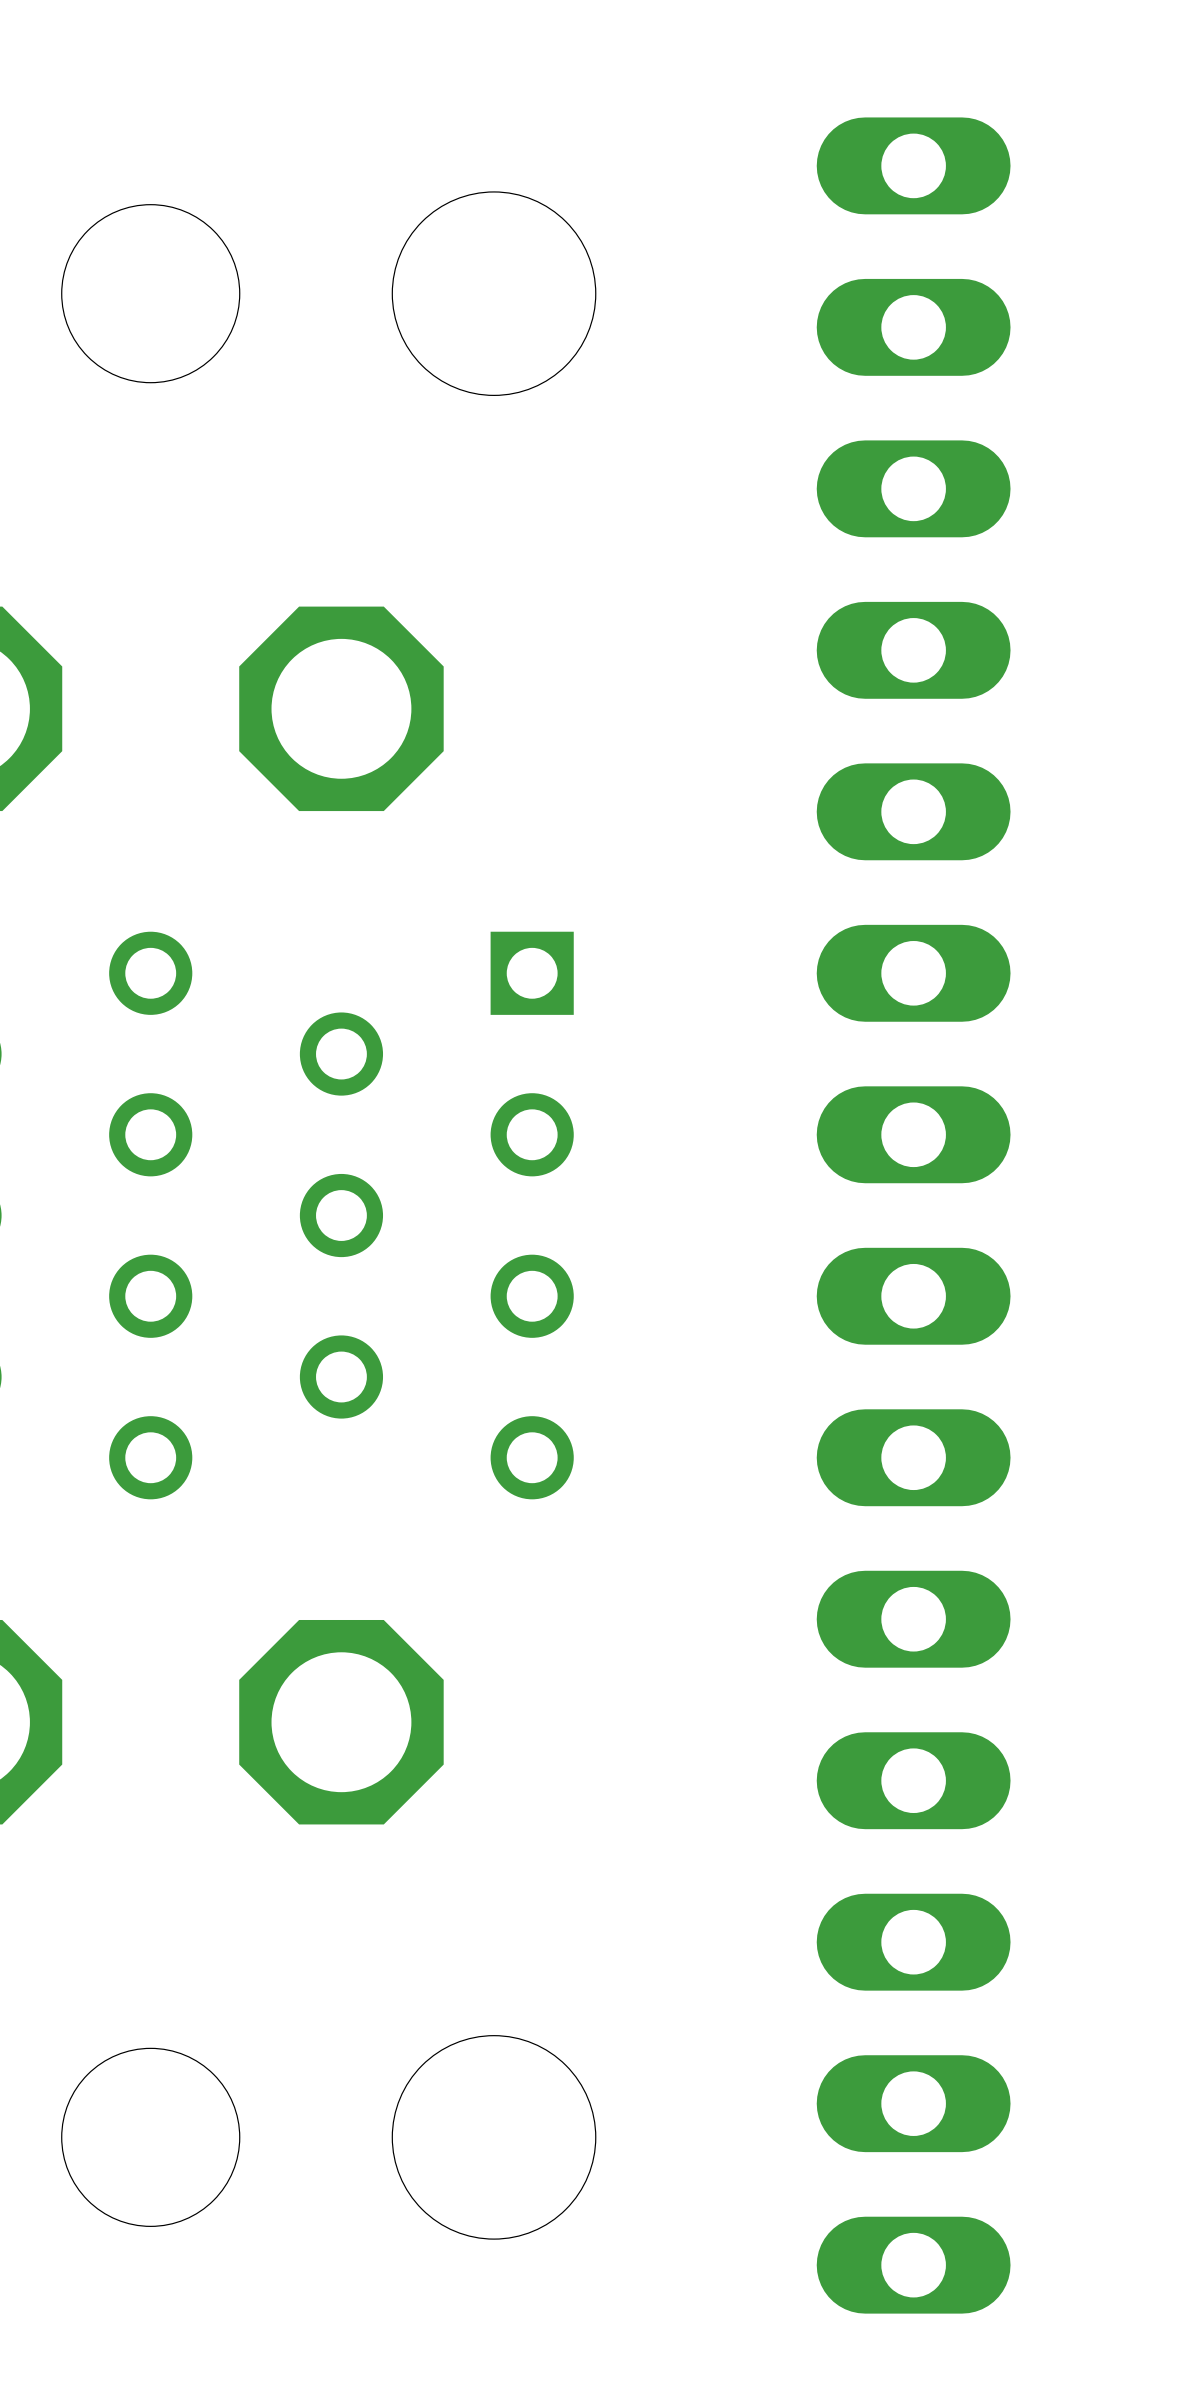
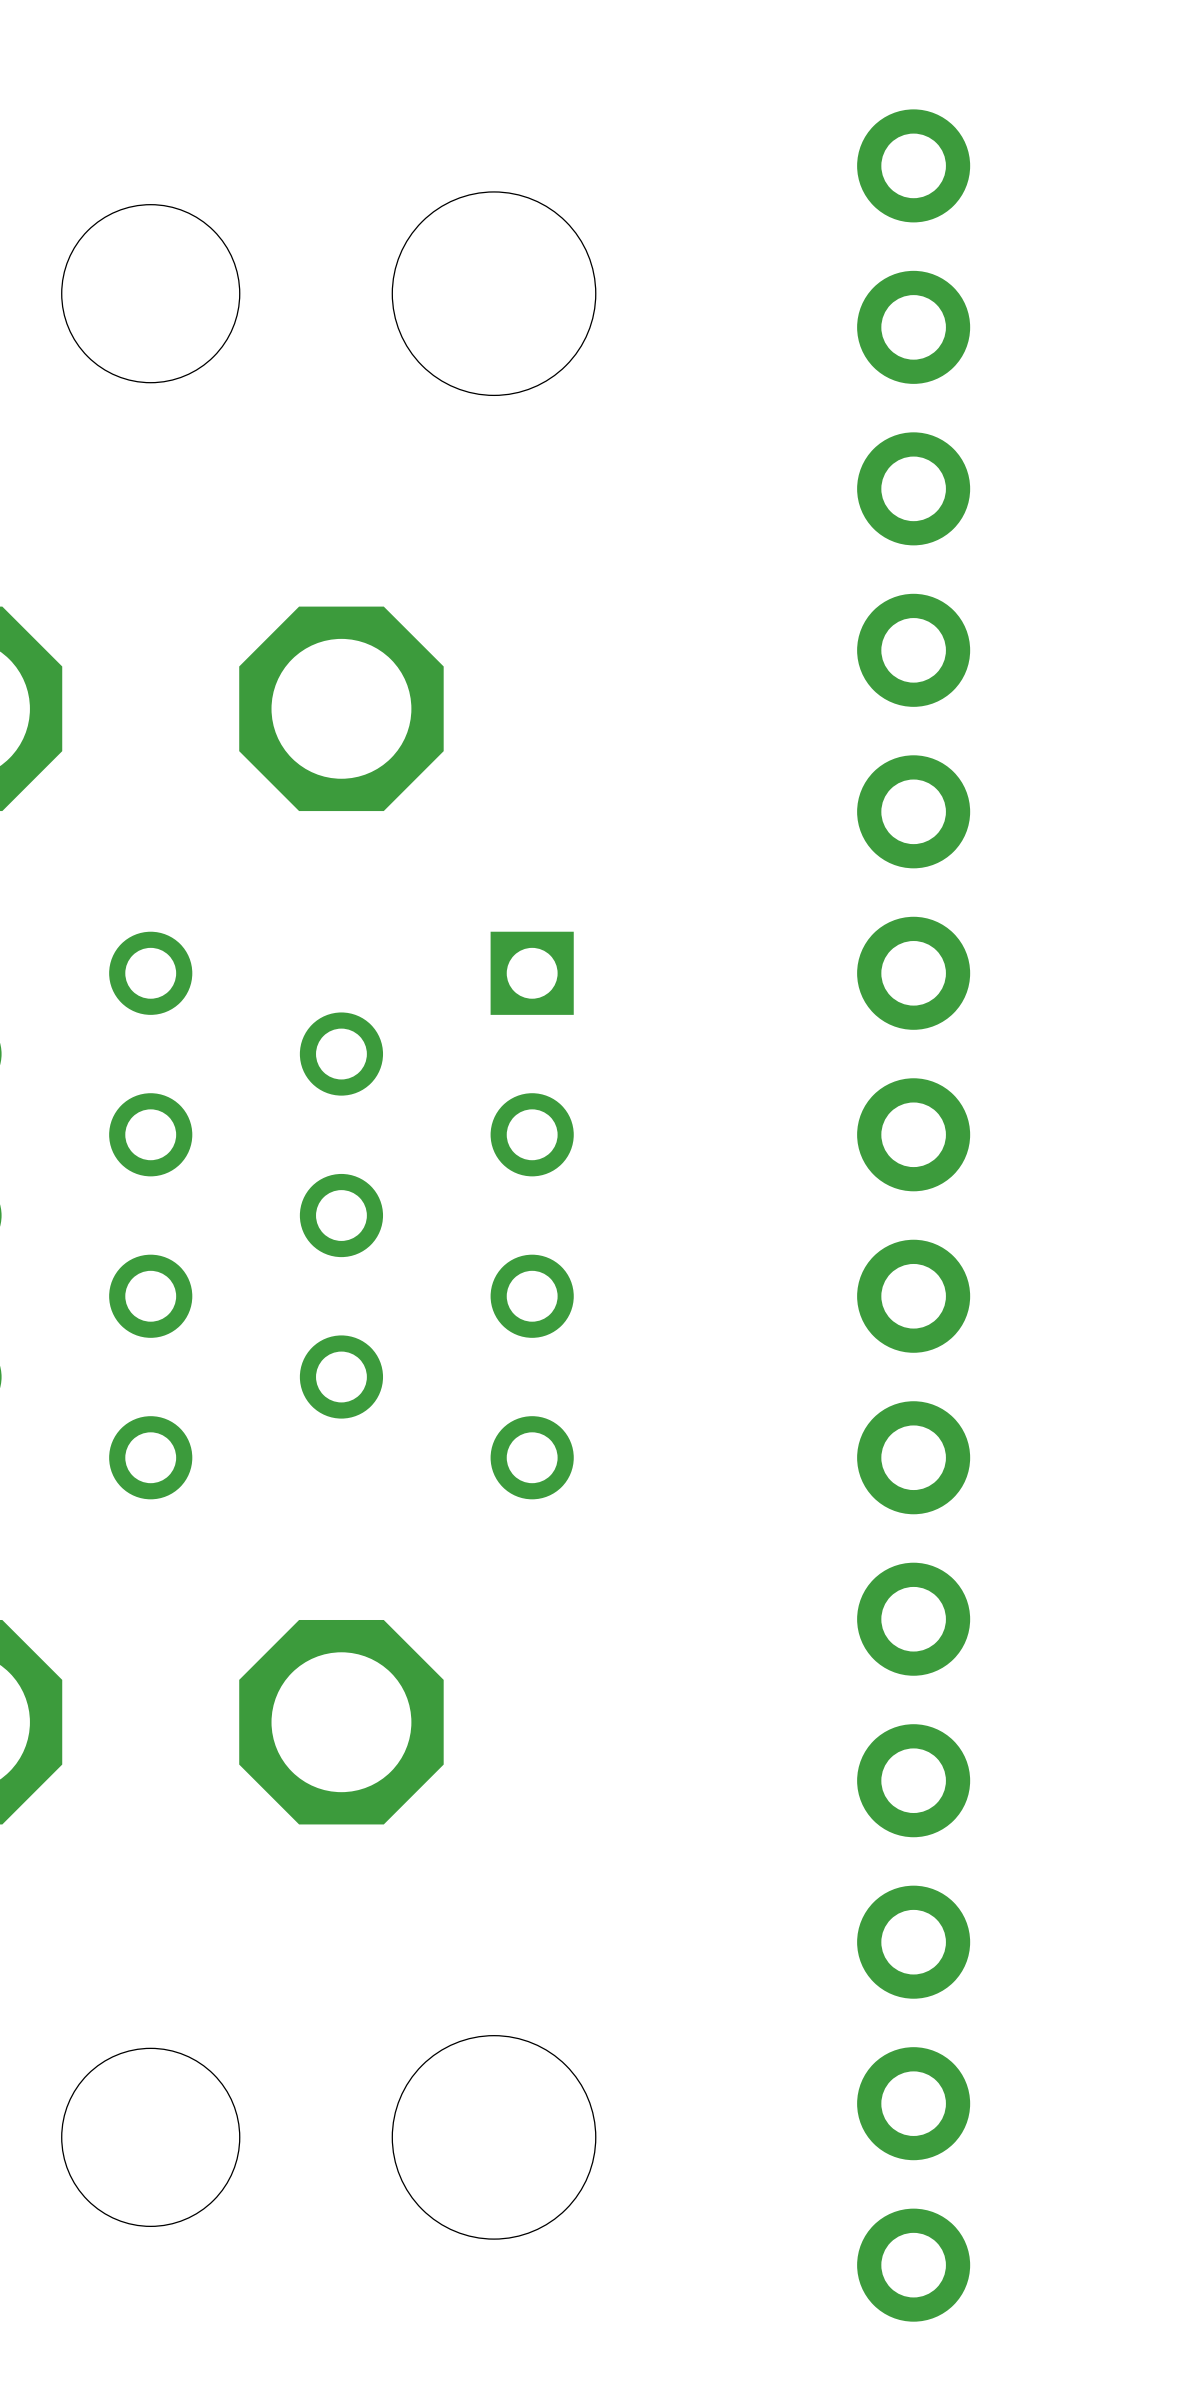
part footprint: [816, 117, 1011, 2314] -> [857, 109, 971, 2322]

